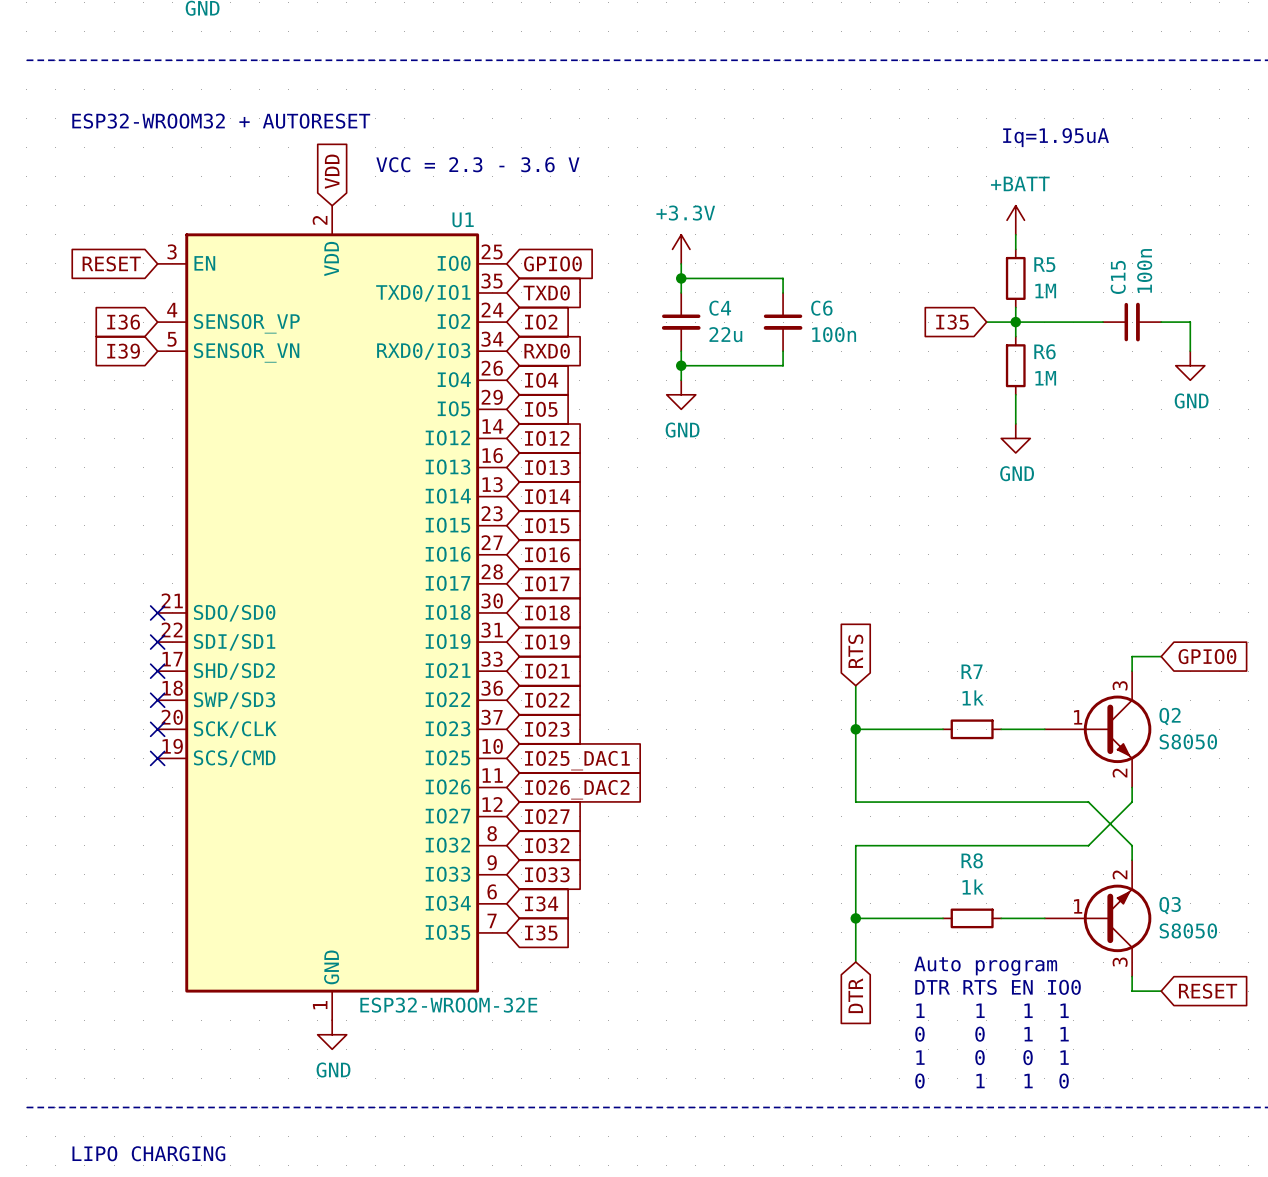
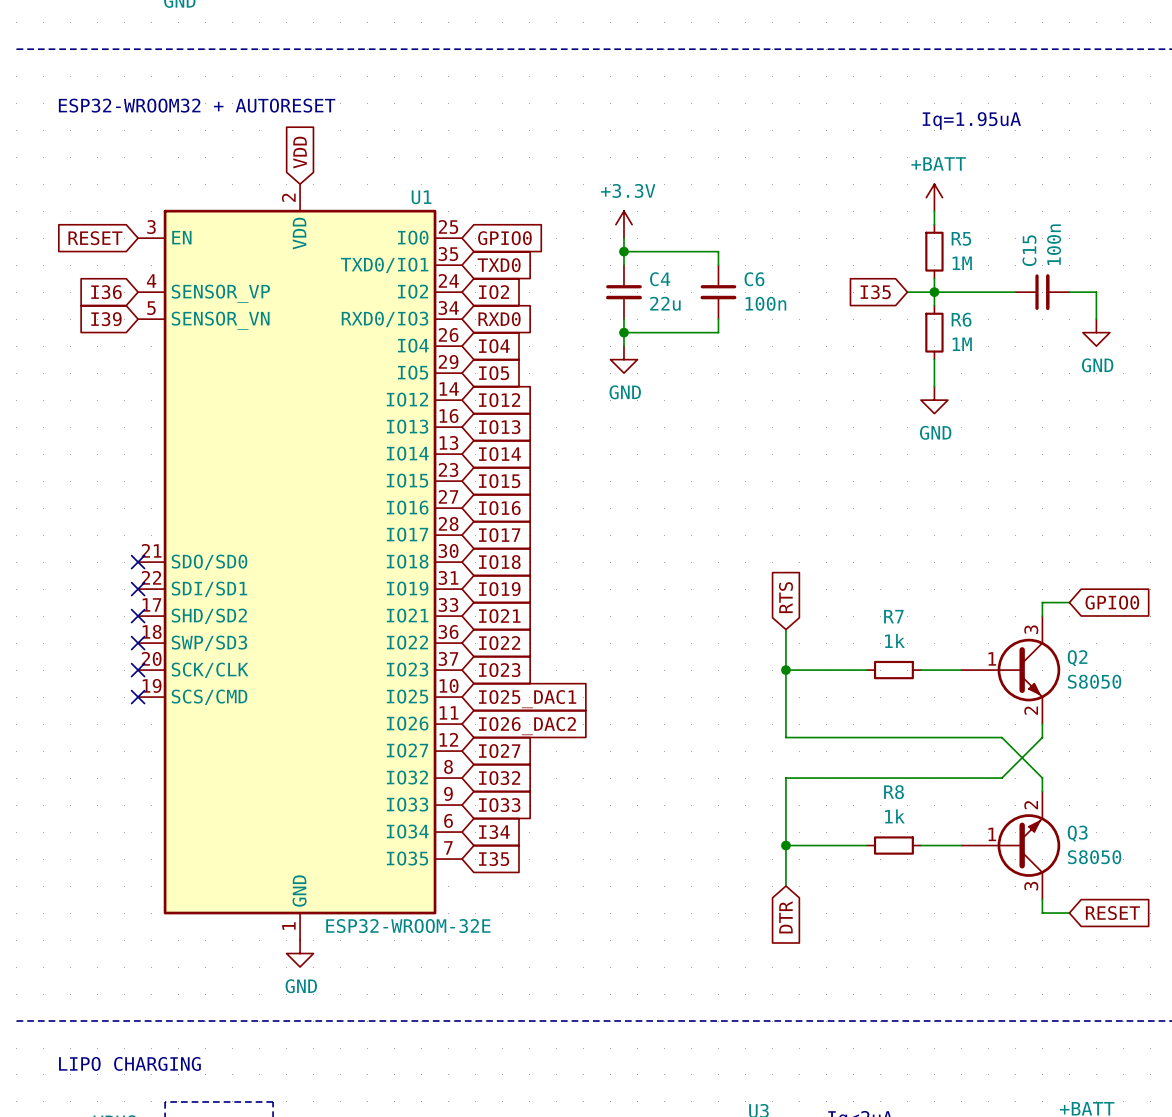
text: VCC = 2.3 - 3.6 V (477, 164) -> none
text: Auto program (985, 966) -> none
text: DTR RTS EN IO0 (998, 987) -> none
text: 1 1 1 1 (992, 1010) -> none
text: 0 0 1 1 (991, 1034) -> none
text: 1 0 0 1 (992, 1057) -> none
text: 0 1 1 0 (992, 1081) -> none

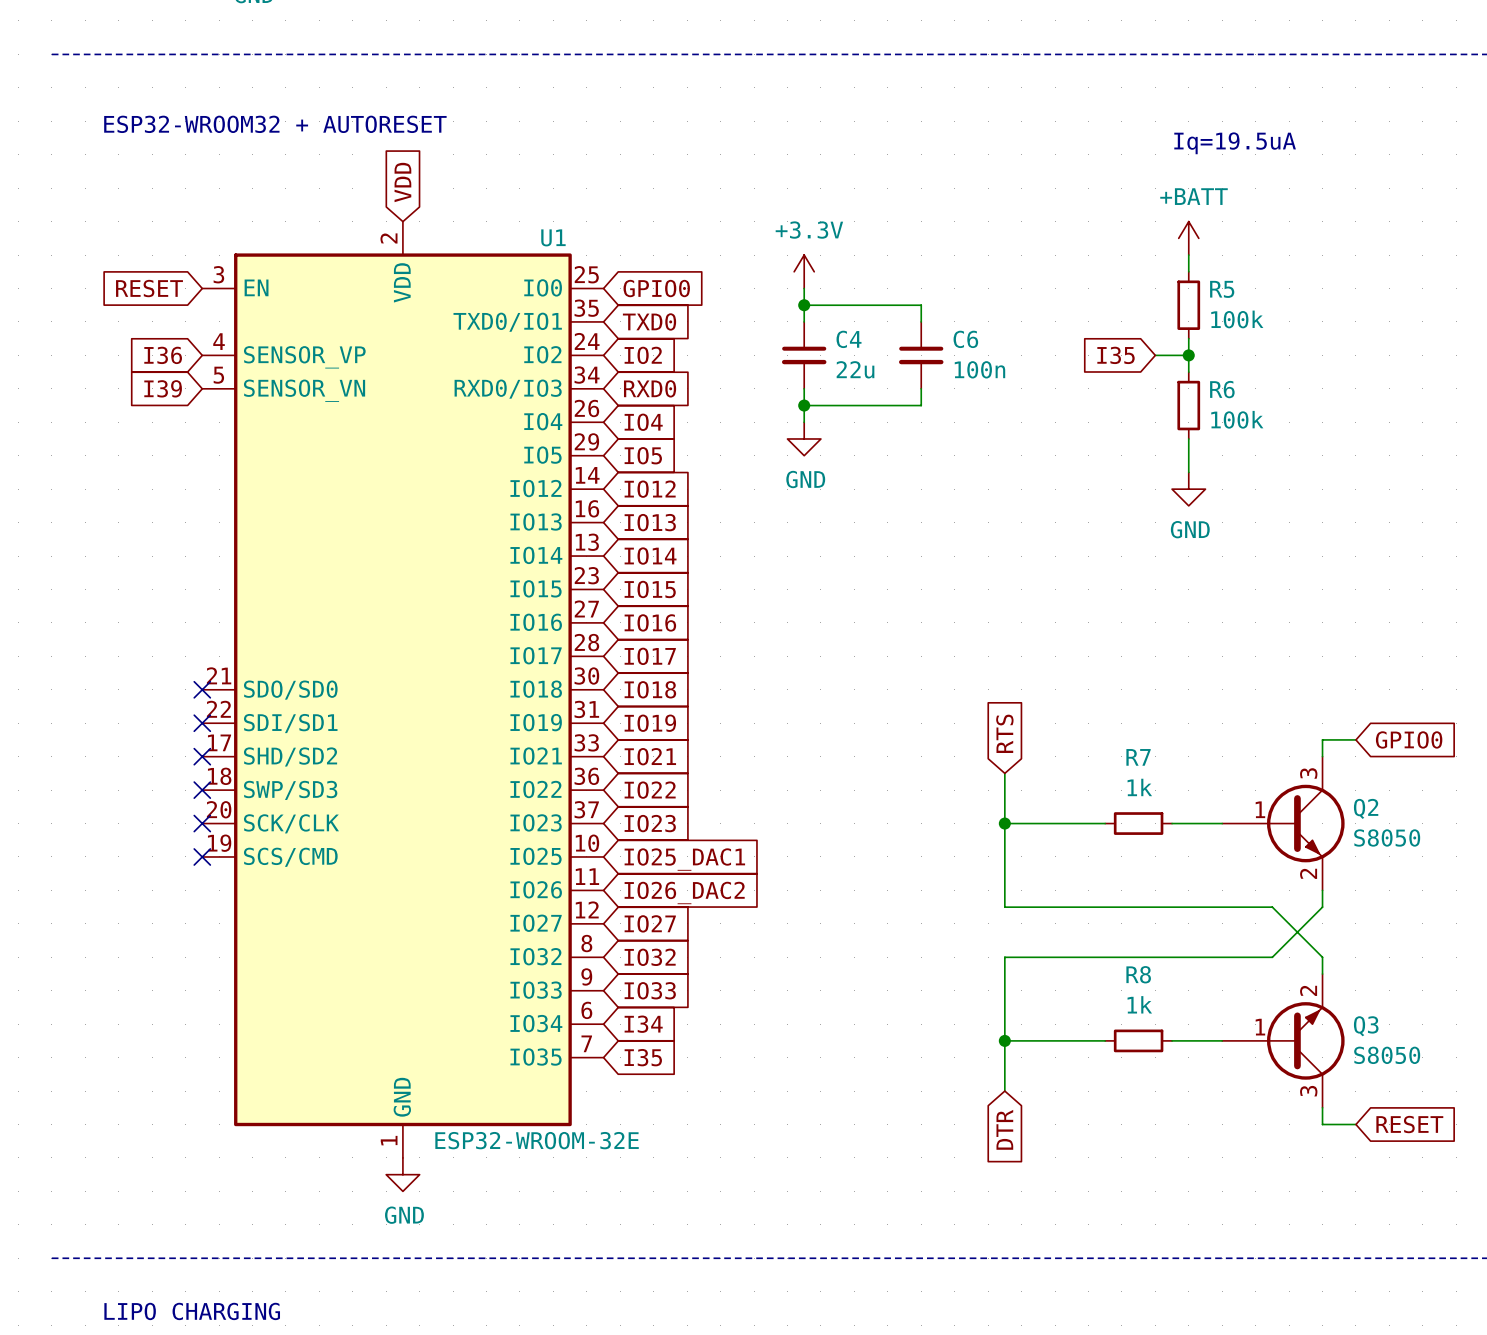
text: Iq=1.95uA (971, 120) -> Iq=19.5uA (1235, 143)
R5 value: 1M (962, 263) -> 100k (1237, 319)
wire: (934, 292) (1015, 292) -> none
C15: 100n (1042, 292) -> none
wire: (1069, 292) (1096, 292) (1096, 319) -> none
power symbol: GND (1096, 332) -> none
R6 value: 1M (962, 344) -> 100k (1237, 419)

